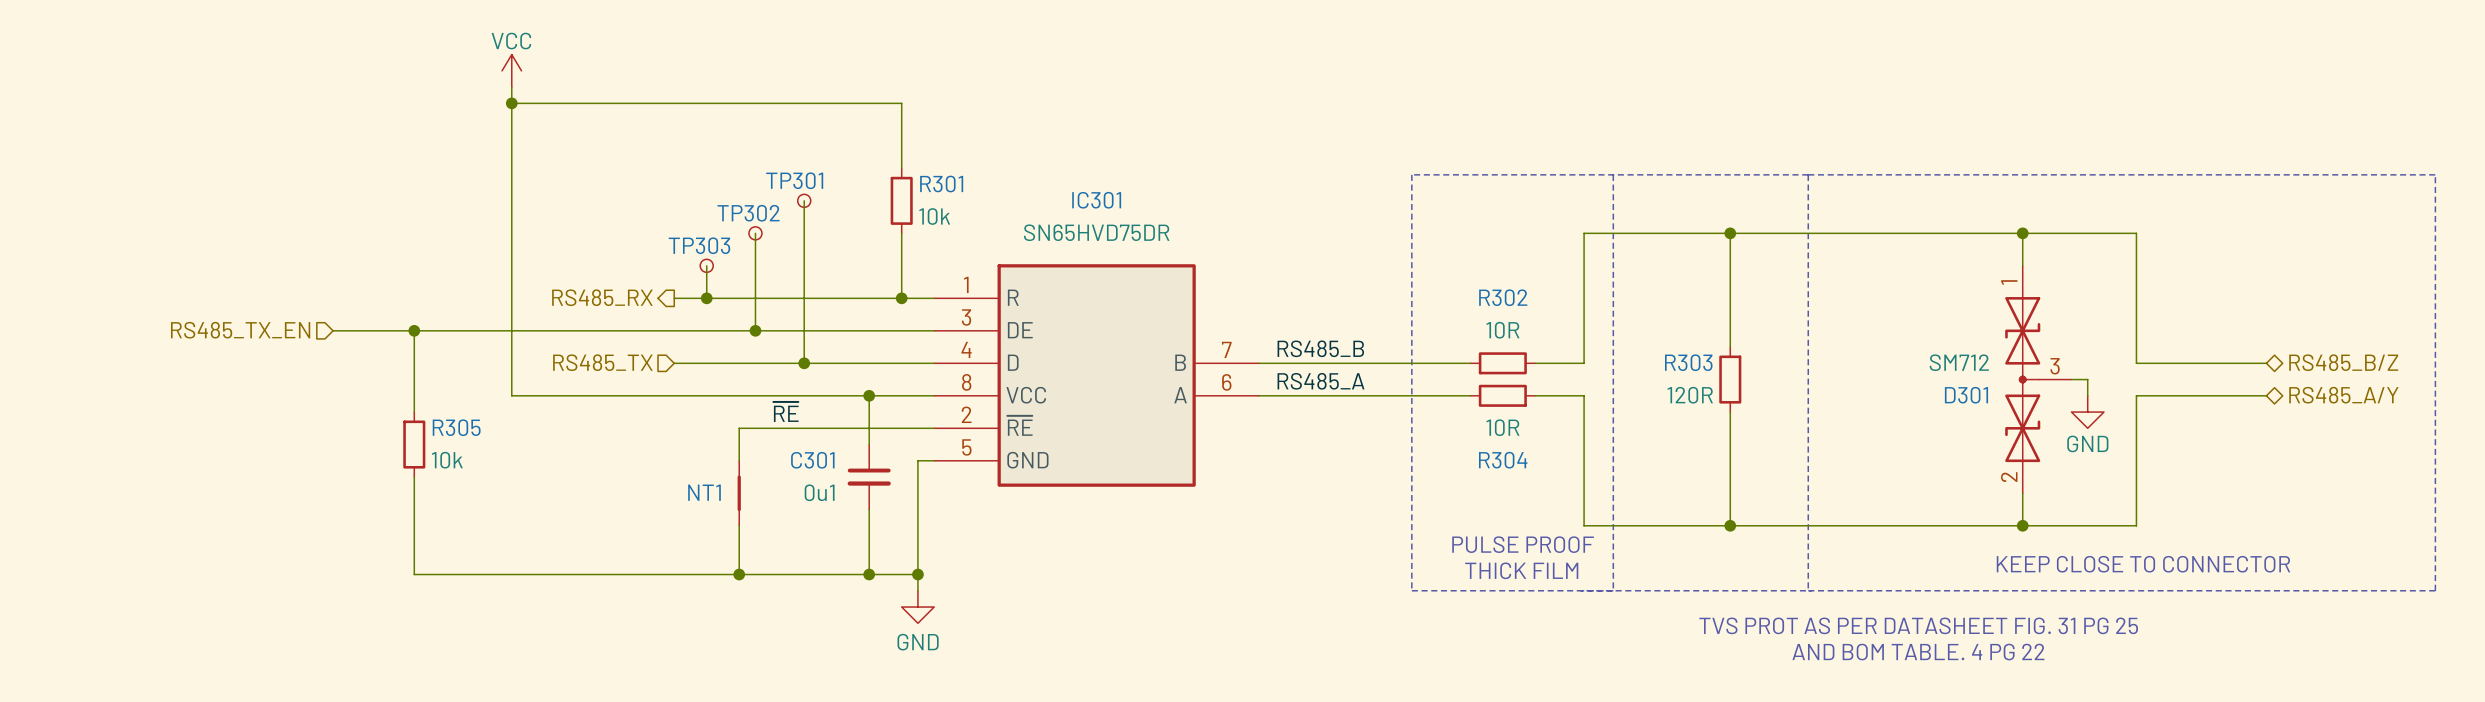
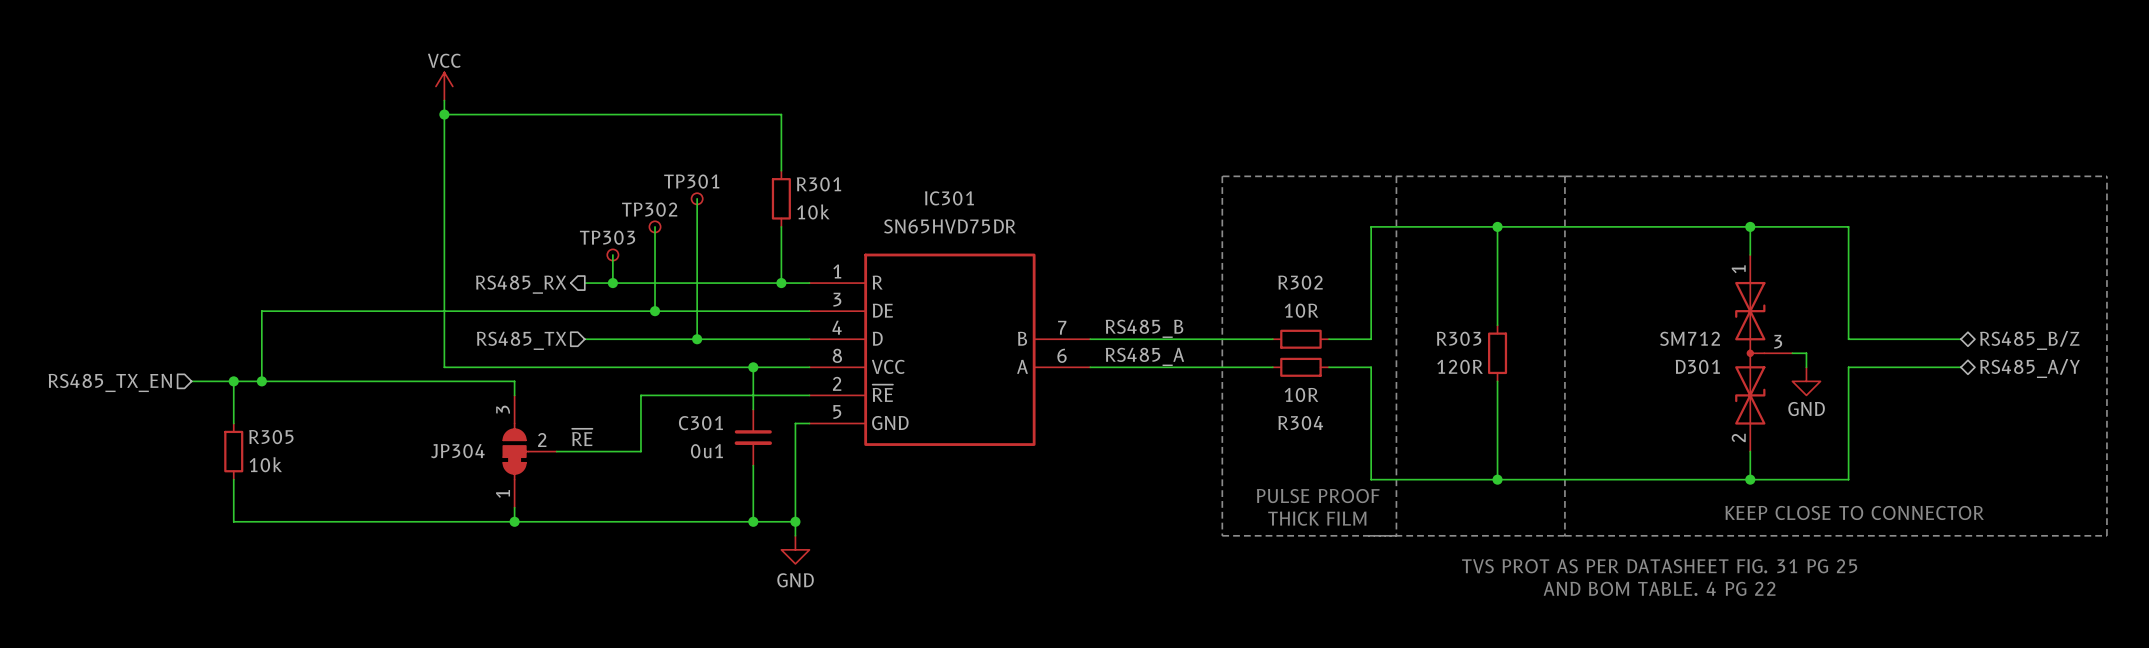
hierarchical label position: RS485_TX_EN (240, 330) -> RS485_TX_EN (110, 382)
wire: none -> (289, 311) (261, 311) (261, 381)
wire: (414, 330) (414, 412) -> none
junction: (414, 330) -> none
label position: ~{RE} (785, 411) -> ~{RE} (582, 437)
wire: none -> (191, 381) (514, 381) (514, 395)
wire: none -> (233, 381) (233, 423)
junction: none -> (233, 381)
junction: none -> (261, 381)
R305 position: (414, 444) -> (233, 451)
wire: none -> (640, 423) (640, 451) (556, 451)
wire: (414, 477) (414, 574) -> (233, 479) (233, 521) (360, 521)
JP304: none -> (530, 451)
NT1: (739, 493) -> none
wire: (739, 525) (739, 574) -> none
wire: none -> (514, 507) (514, 521)
junction: none -> (514, 521)
junction: (739, 574) -> none

